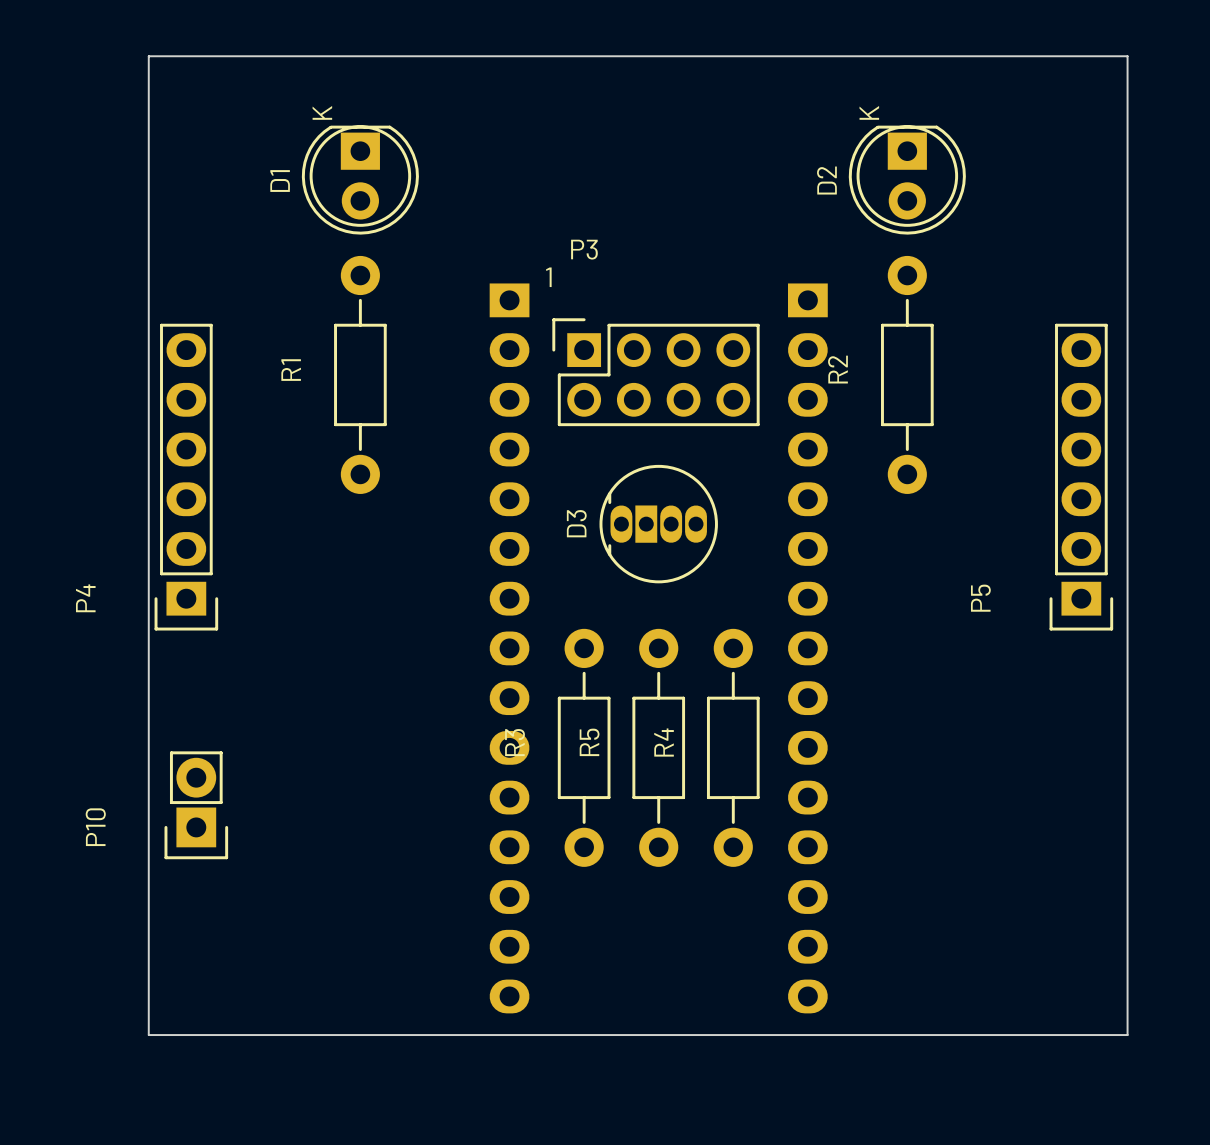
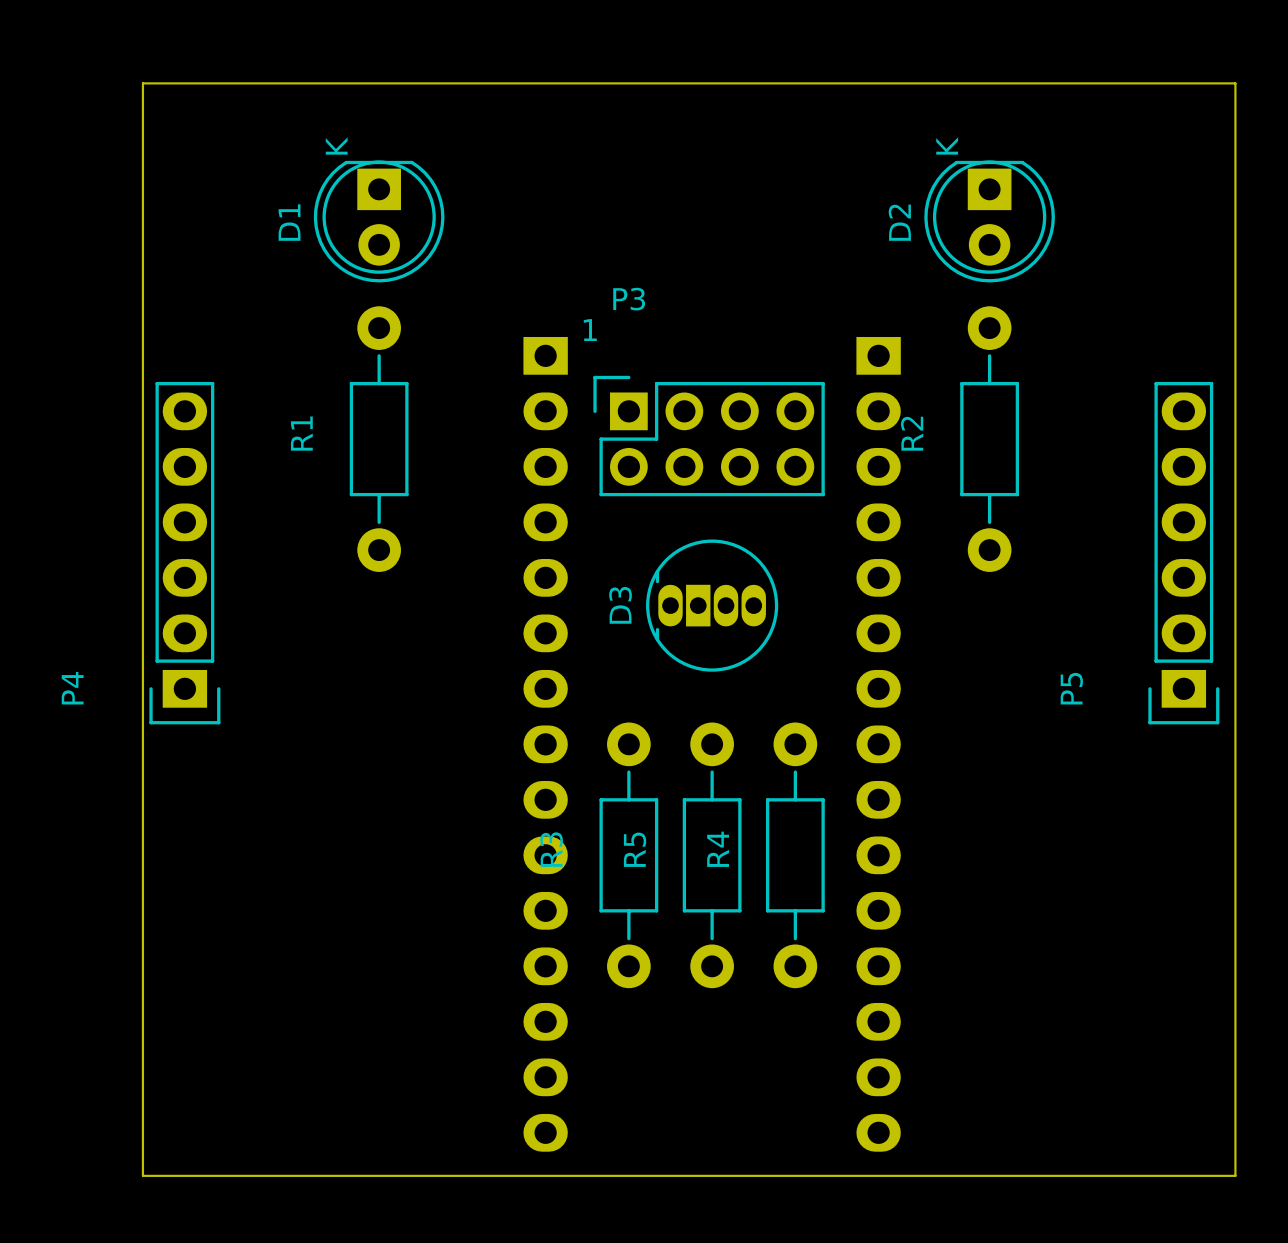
P10: (196, 805) -> none

